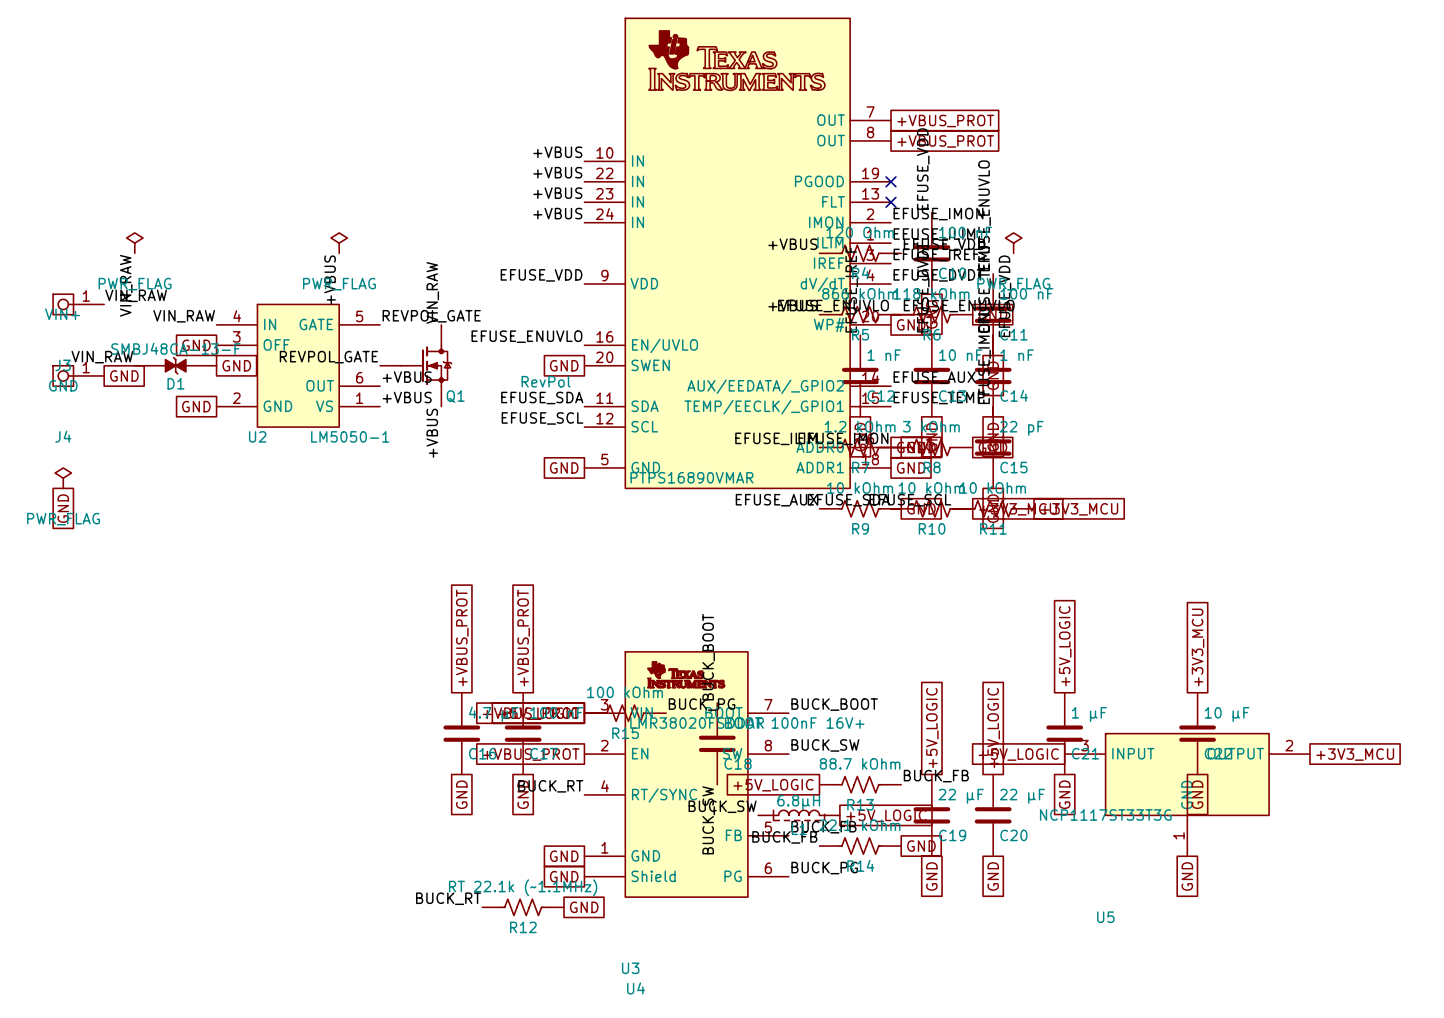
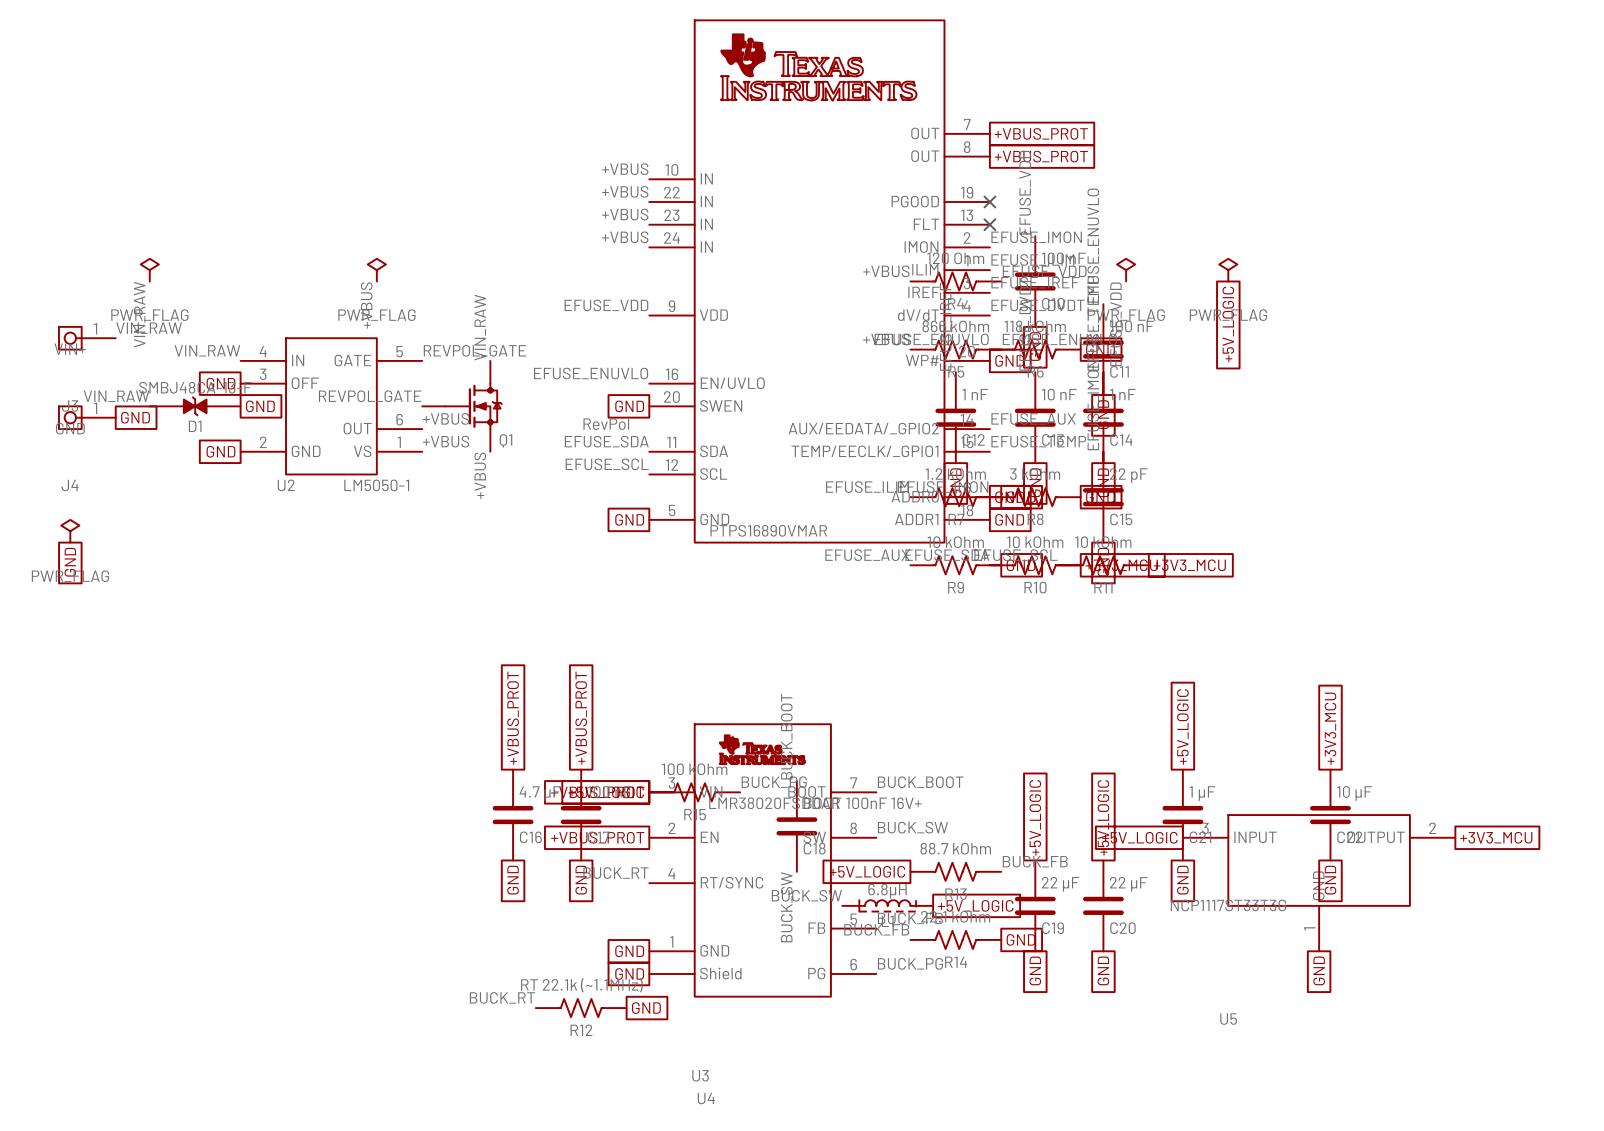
power symbol: none -> PWR_FLAG (1228, 270)
global label: none -> +5V_LOGIC (1228, 324)

